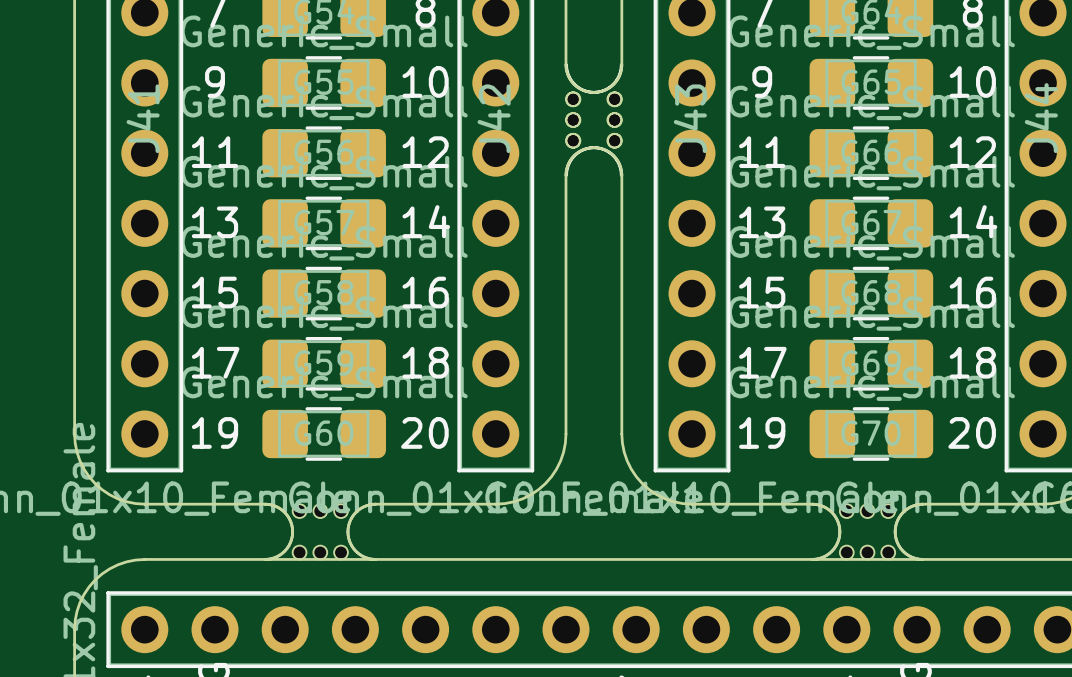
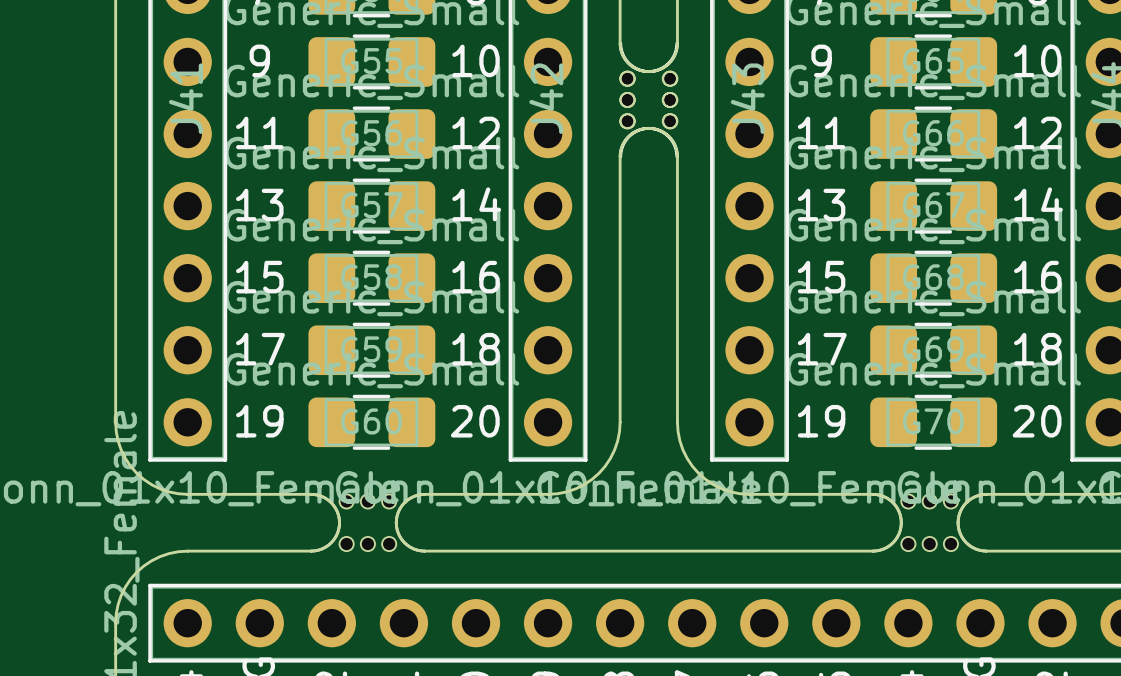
board edge: (265, 559) (375, 559) -> none
board edge: (812, 559) (922, 559) -> none

